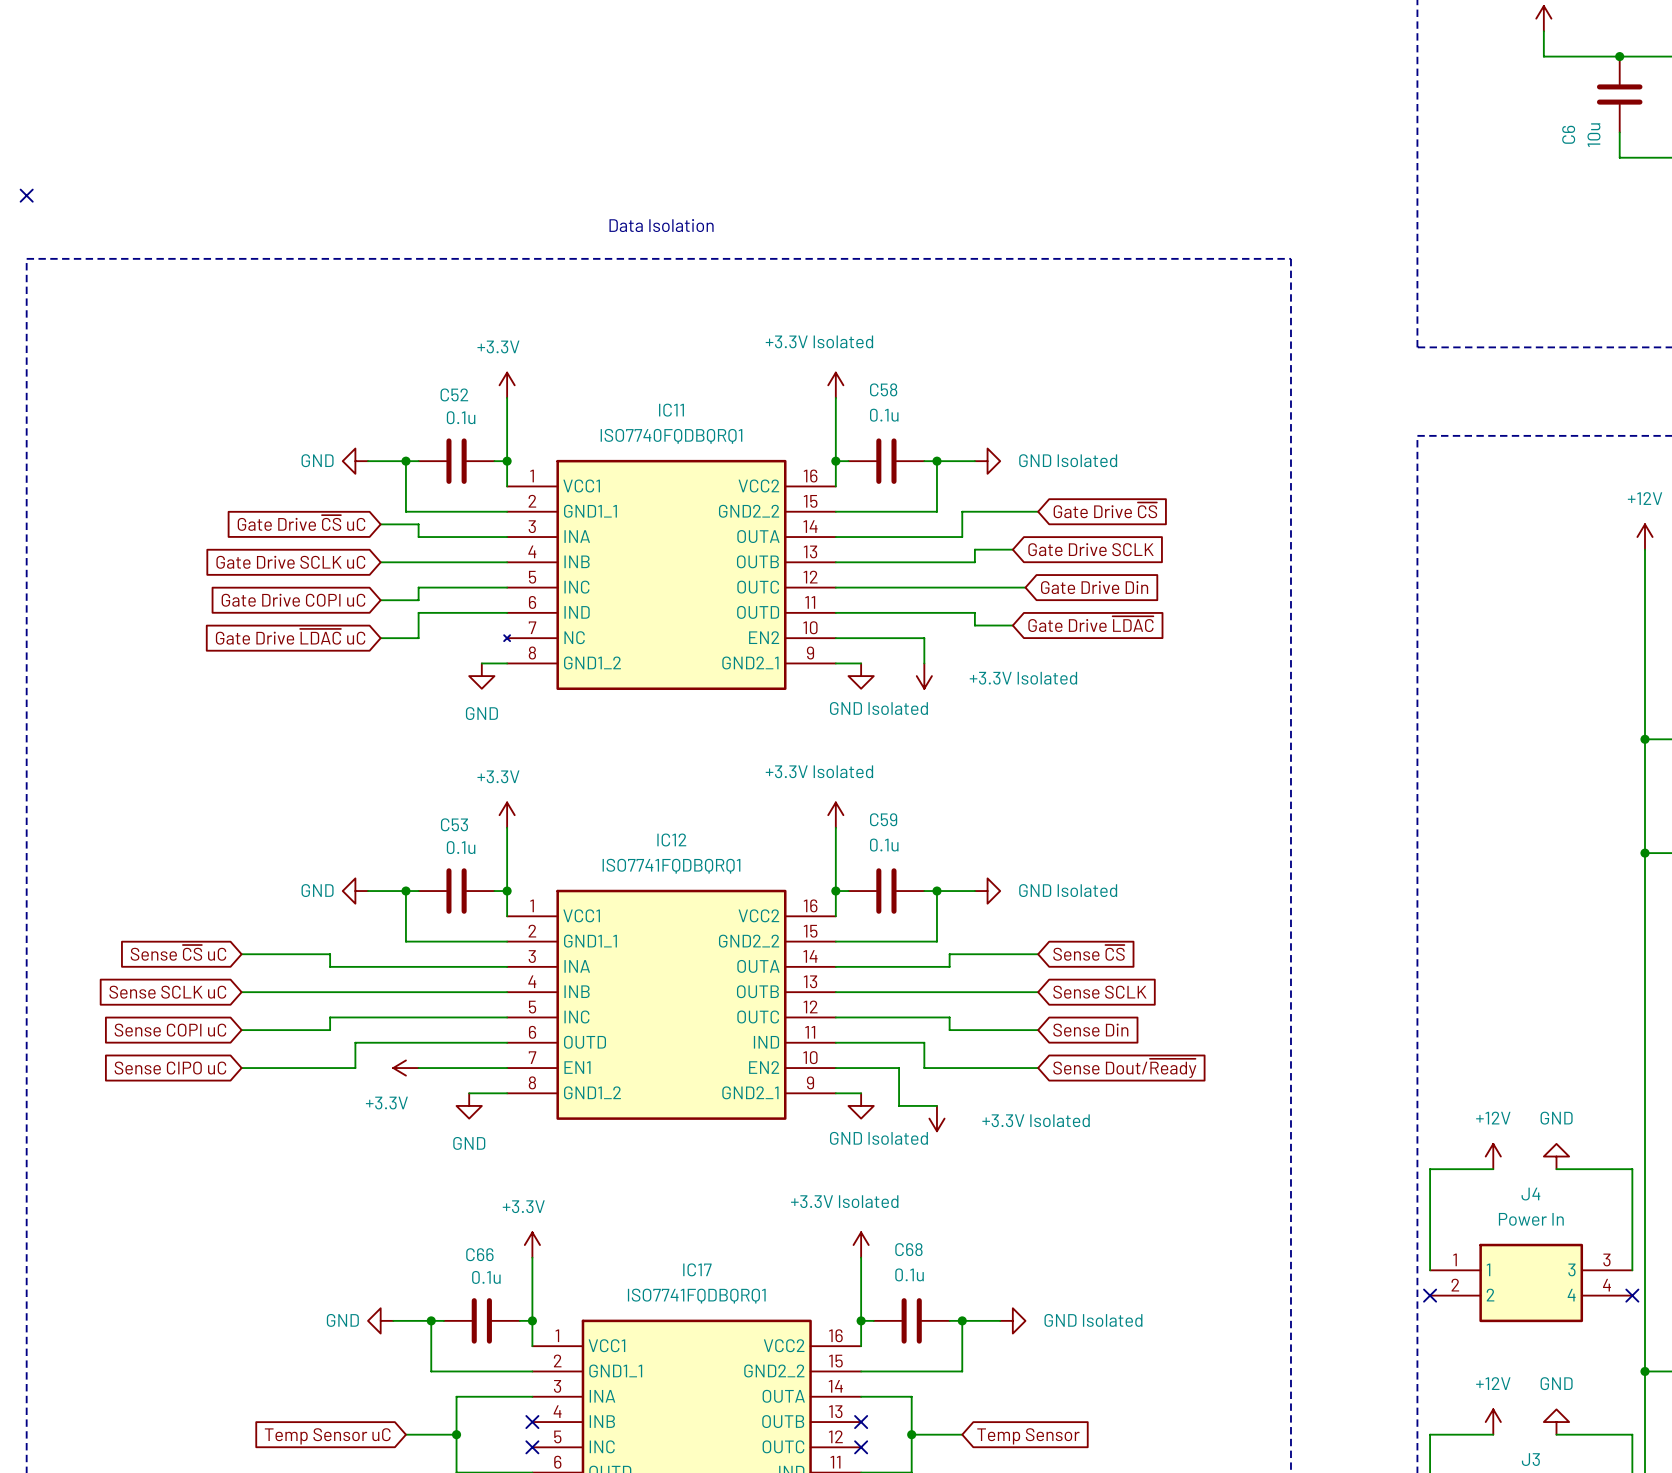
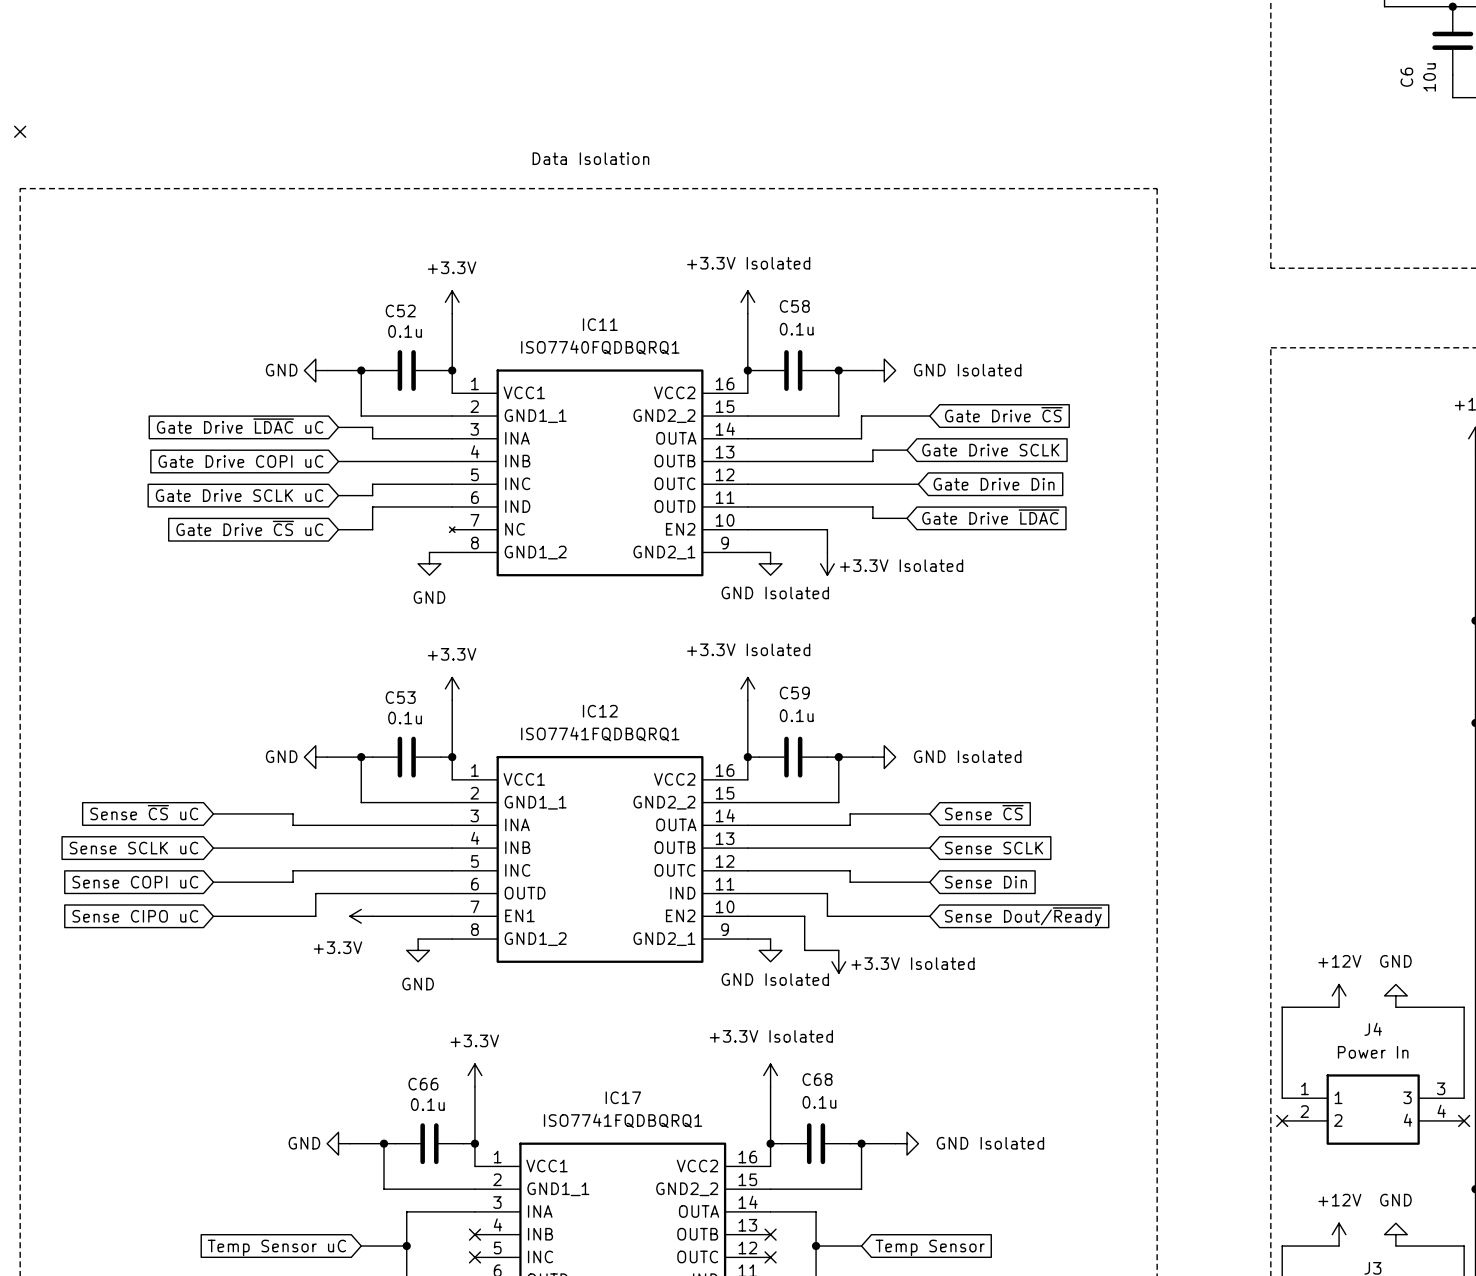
global label: Gate Drive ~{CS} uC (301, 523) -> Gate Drive ~{LDAC} uC (240, 426)
global label: Gate Drive SCLK uC (290, 562) -> Gate Drive COPI uC (240, 461)
global label: Gate Drive COPI uC (293, 600) -> Gate Drive SCLK uC (239, 495)
global label: Gate Drive ~{LDAC} uC (290, 636) -> Gate Drive ~{CS} uC (249, 528)

